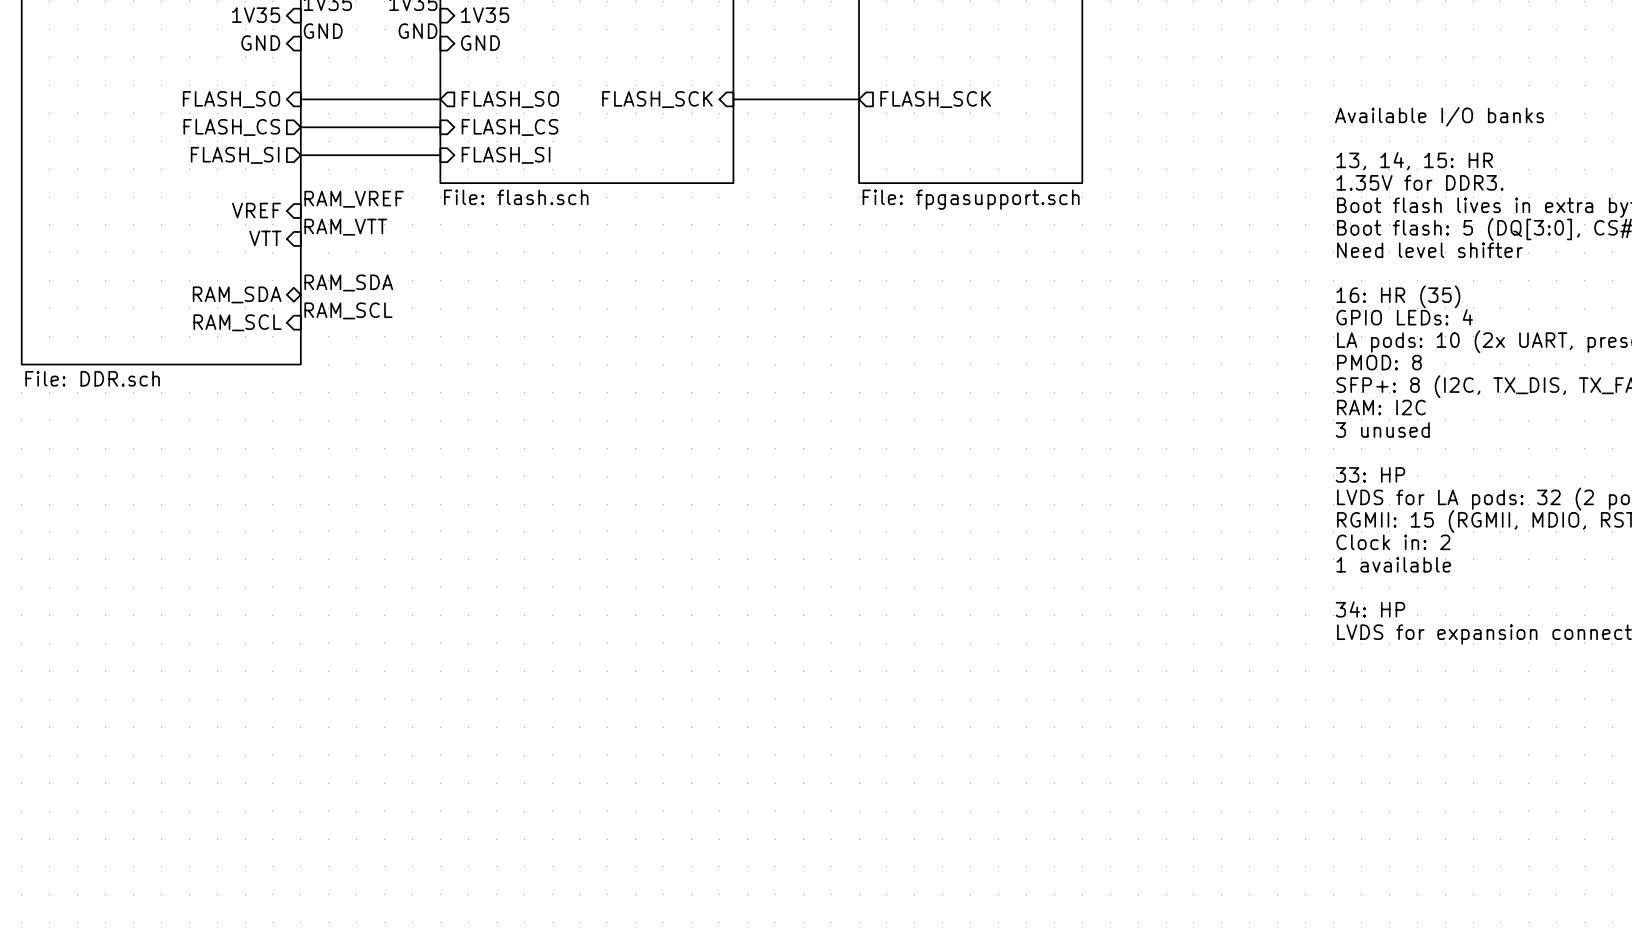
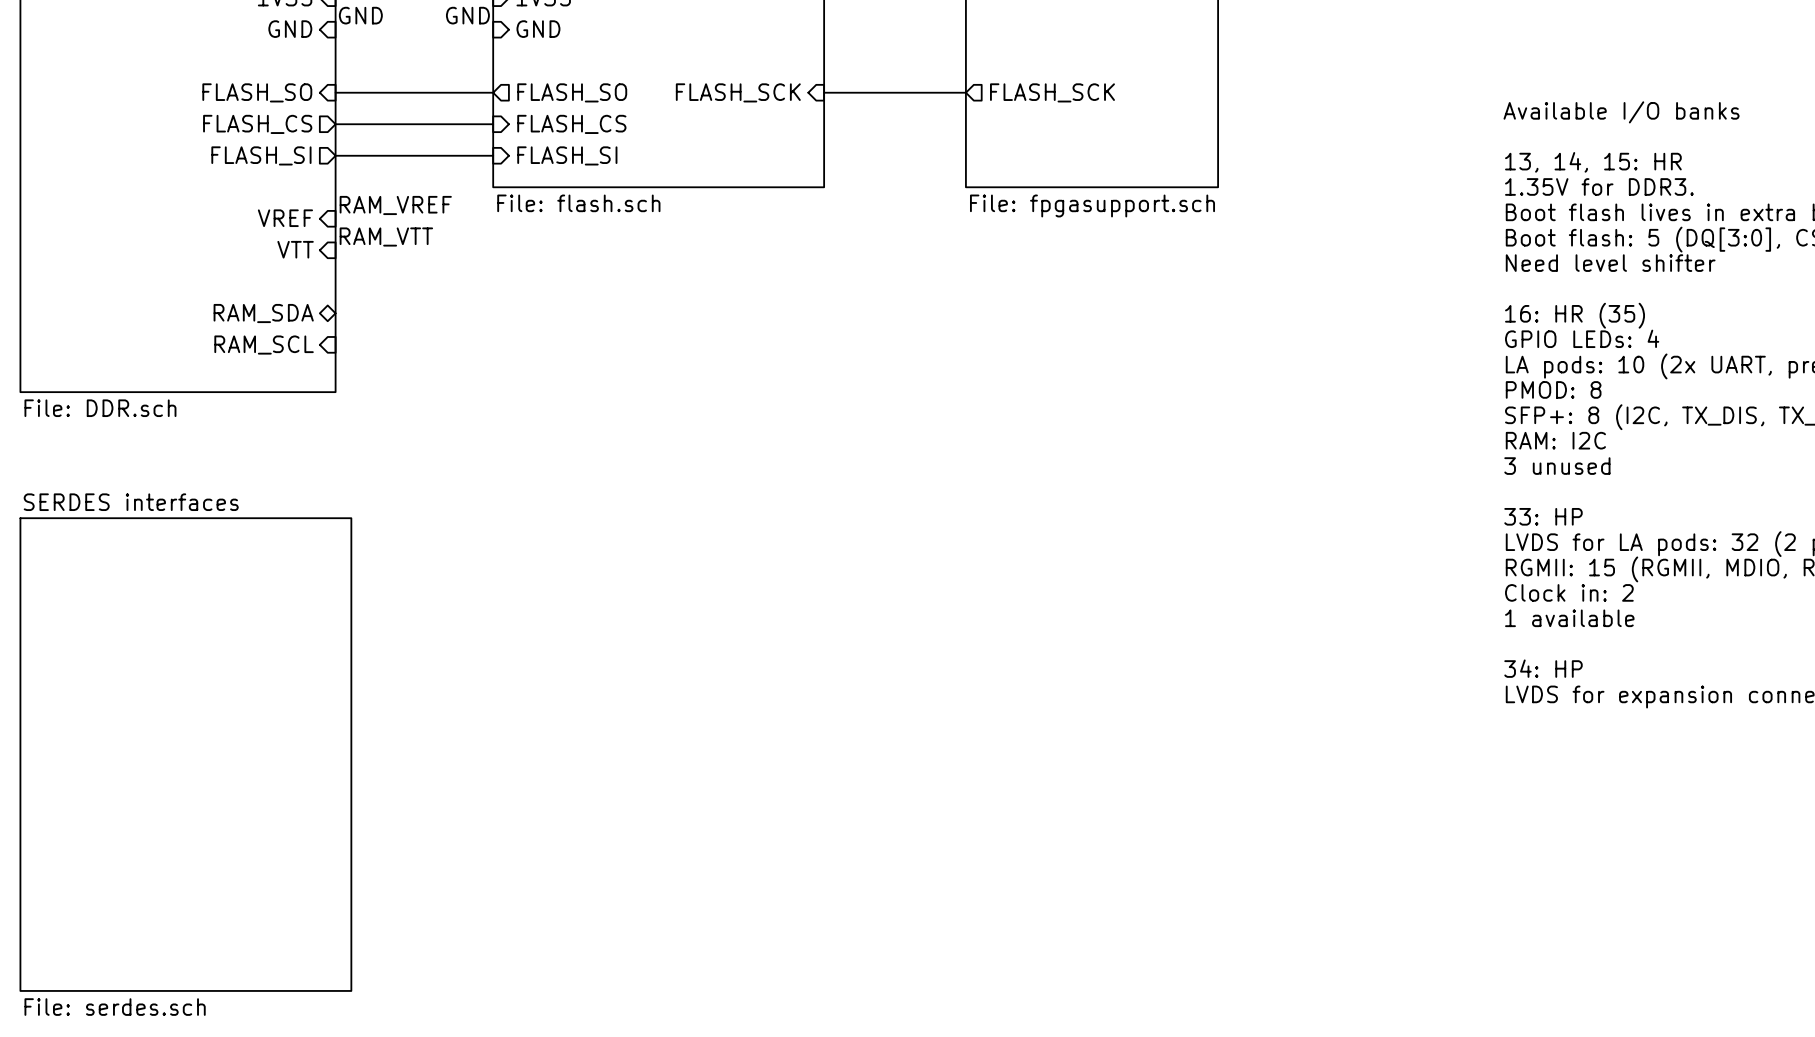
label: RAM_SDA (348, 282) -> none
label: RAM_SCL (348, 310) -> none
sheet SERDES interfaces: none -> File: serdes.sch (185, 754)

